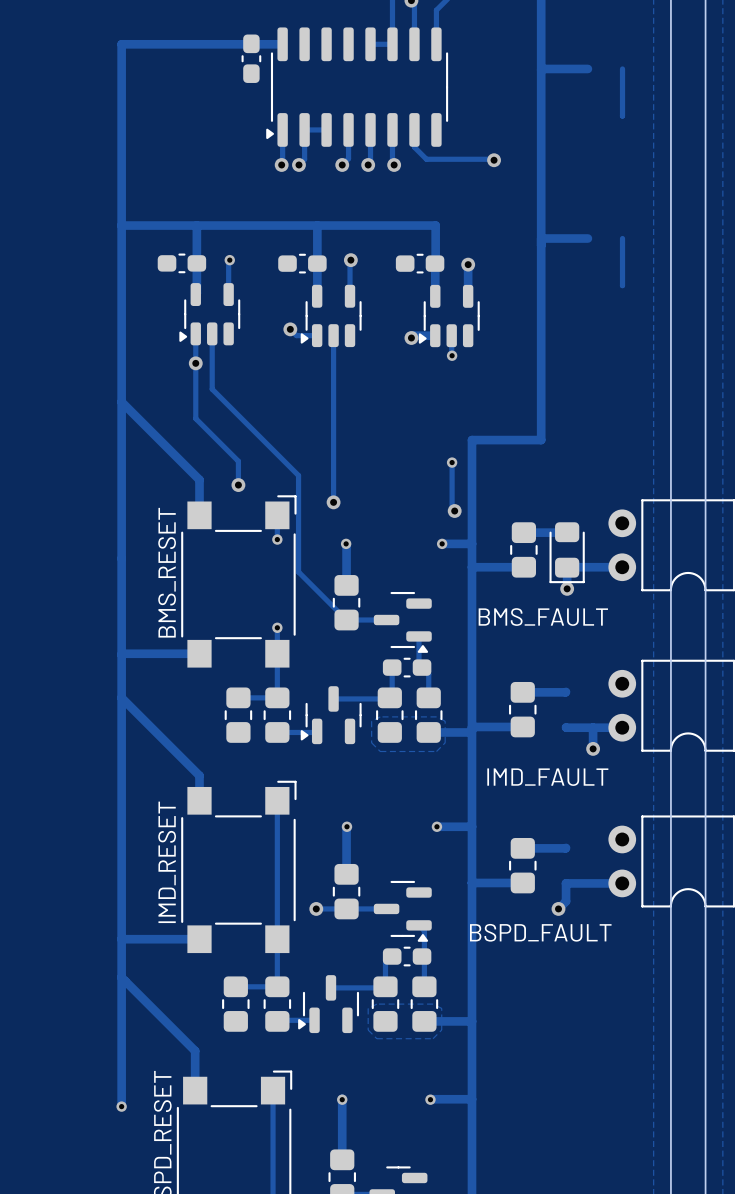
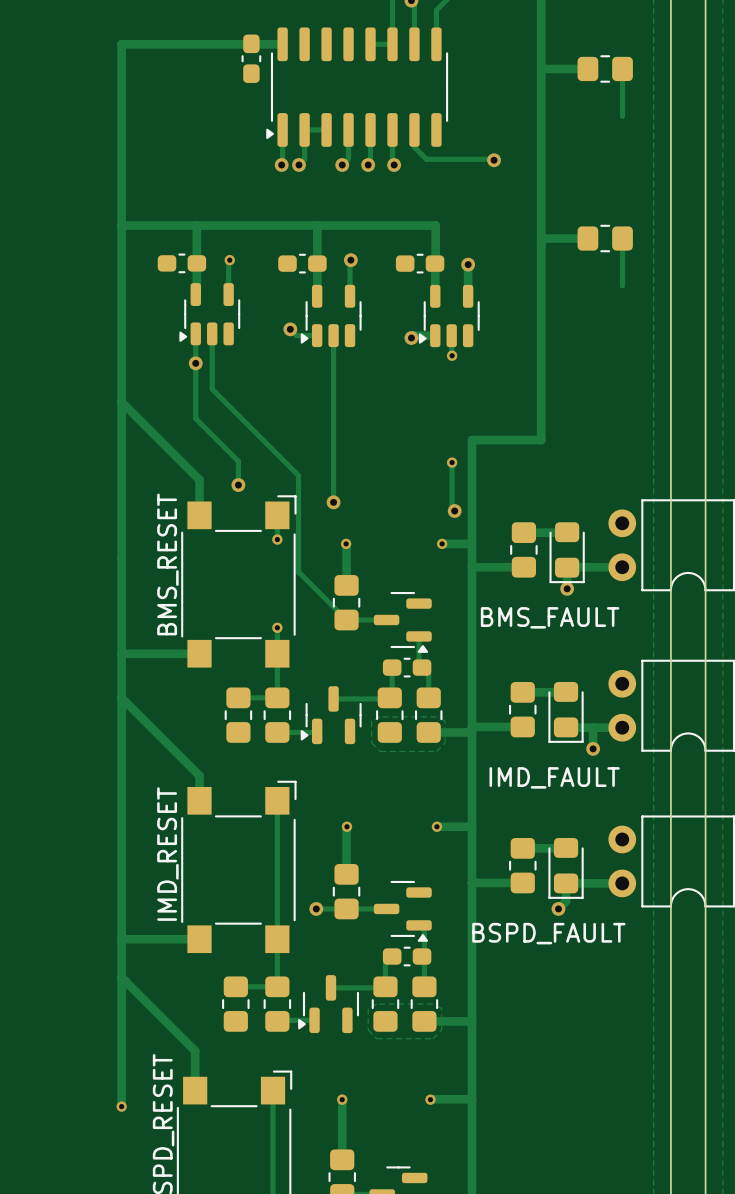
part: none -> (605, 68)
part: none -> (605, 238)
part: none -> (566, 712)
part: none -> (566, 868)

